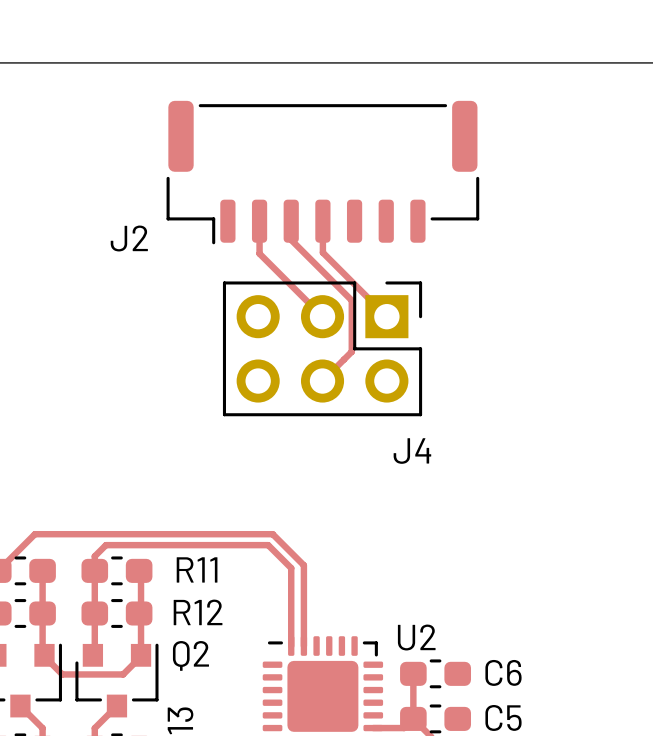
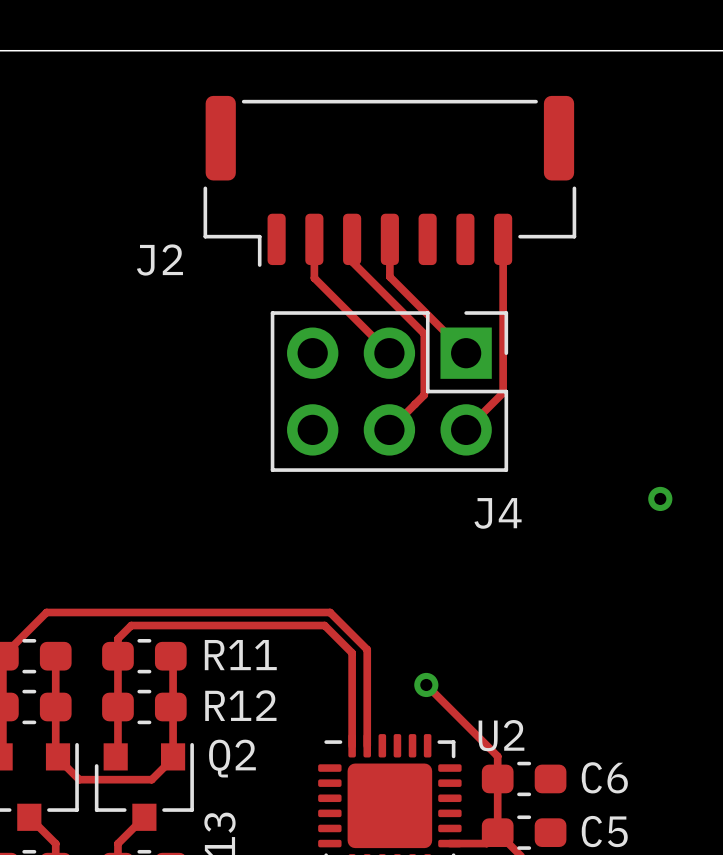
track: none -> (503, 239) (503, 392) (466, 429)
via: none -> (660, 498)
track: none -> (426, 684) (497, 756) (497, 778)
via: none -> (426, 684)

